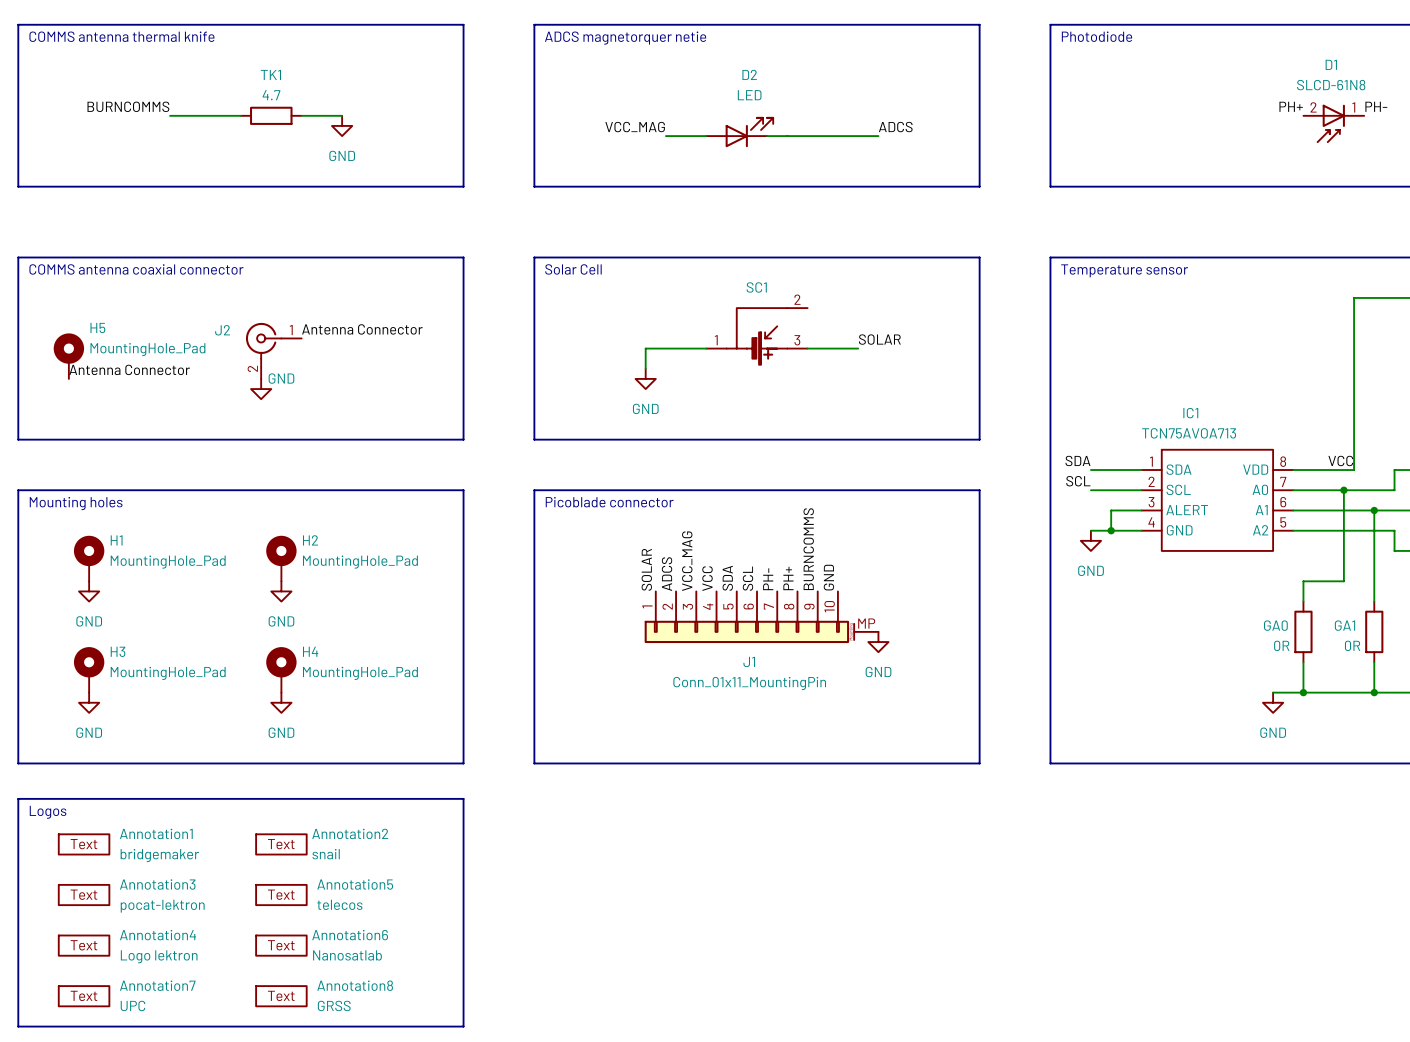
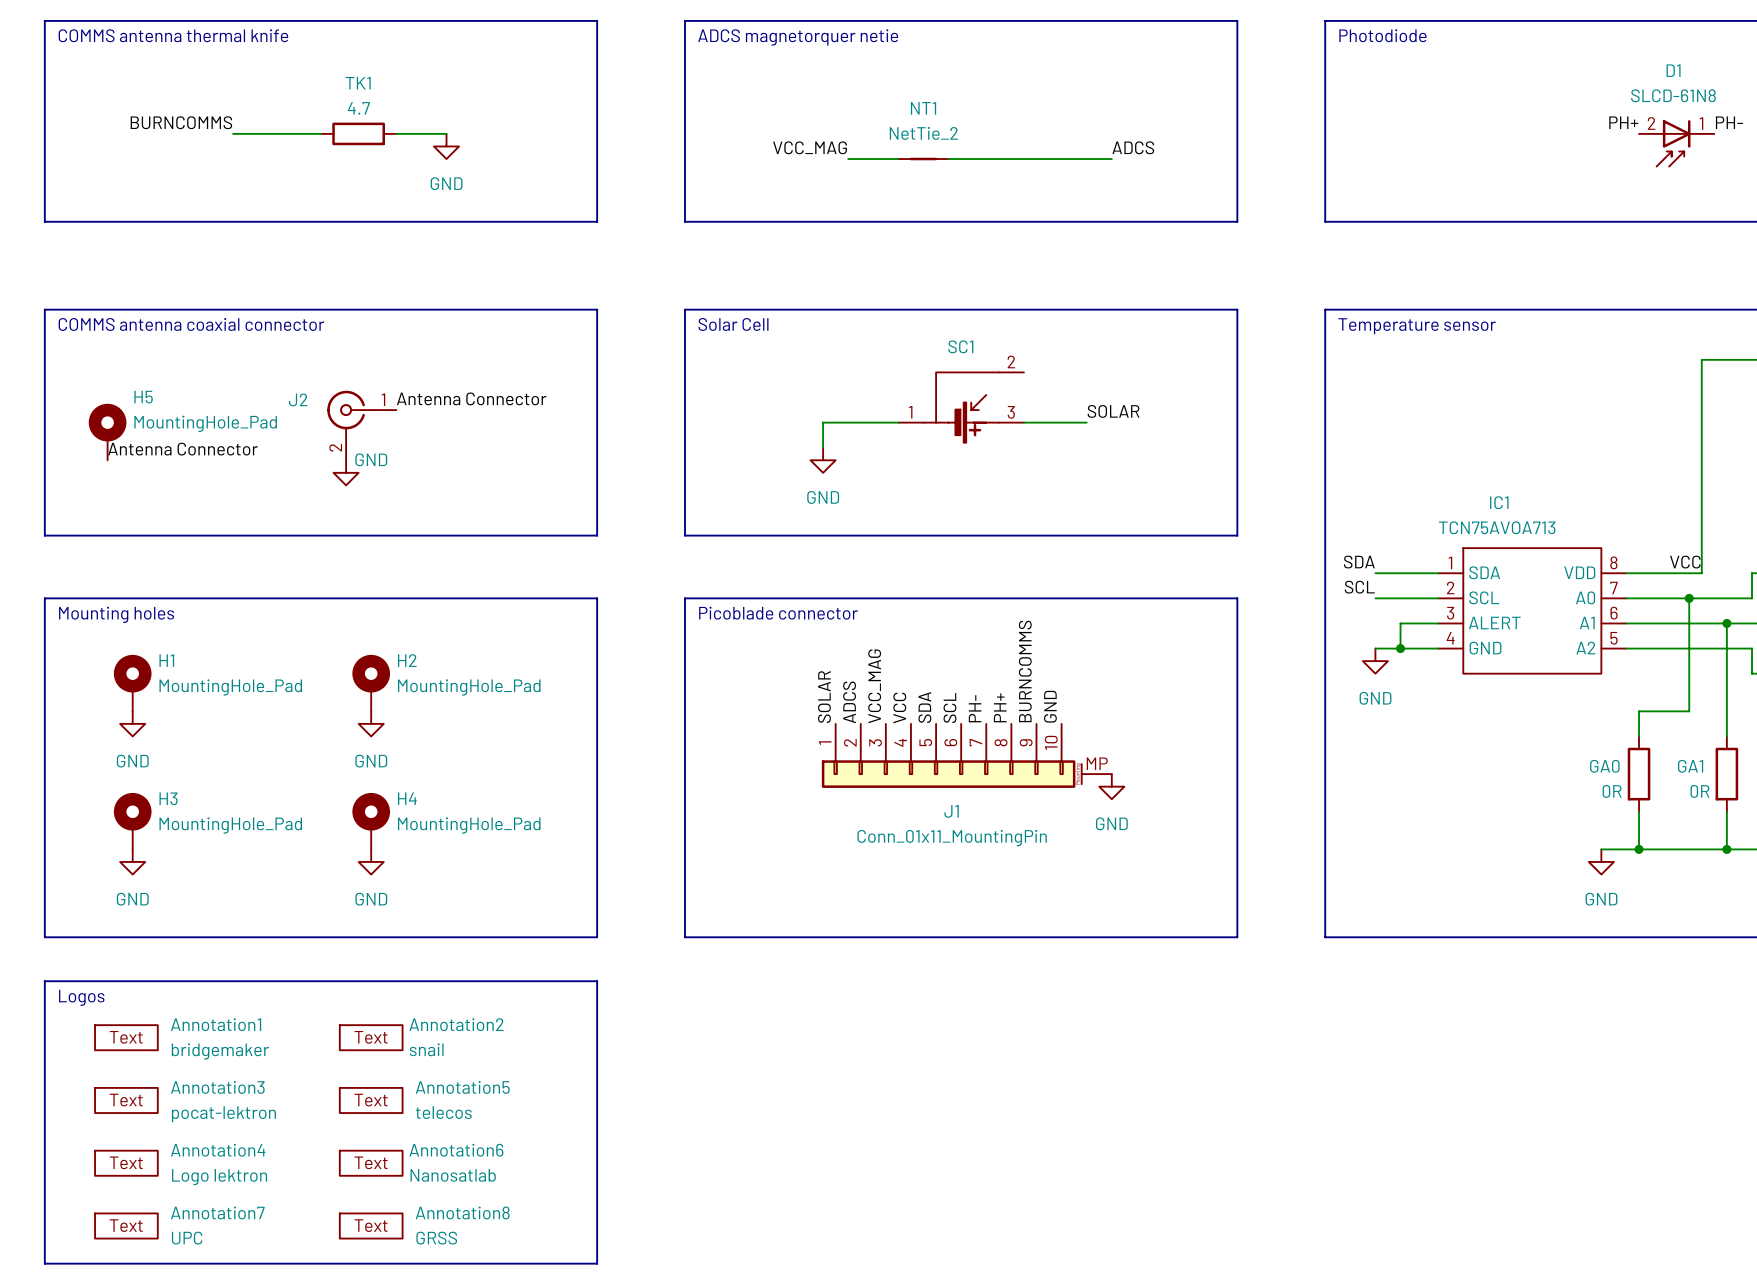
D2: LED (739, 132) -> none
NT1: none -> NetTie_2 (923, 159)

